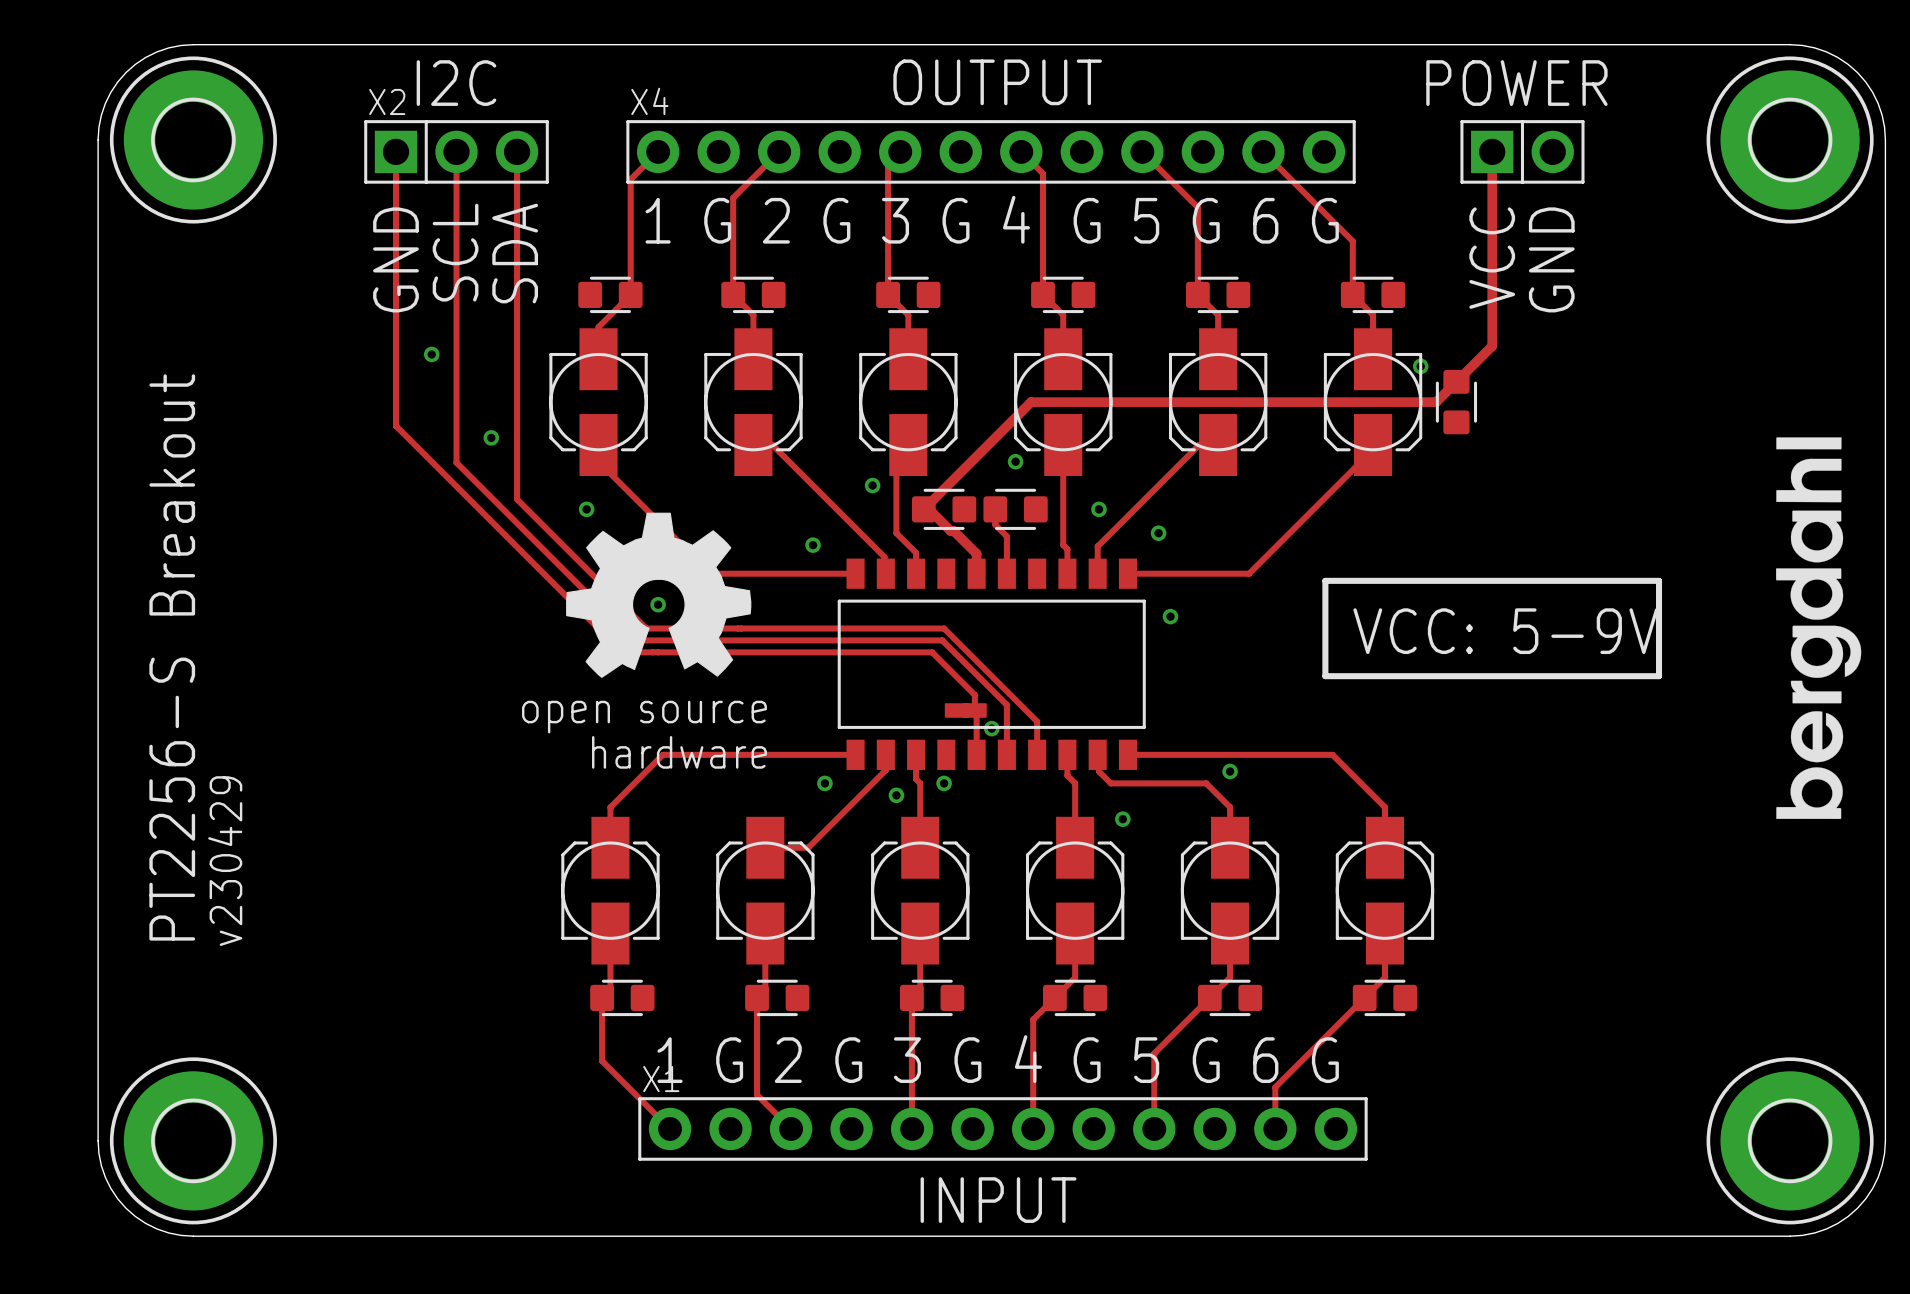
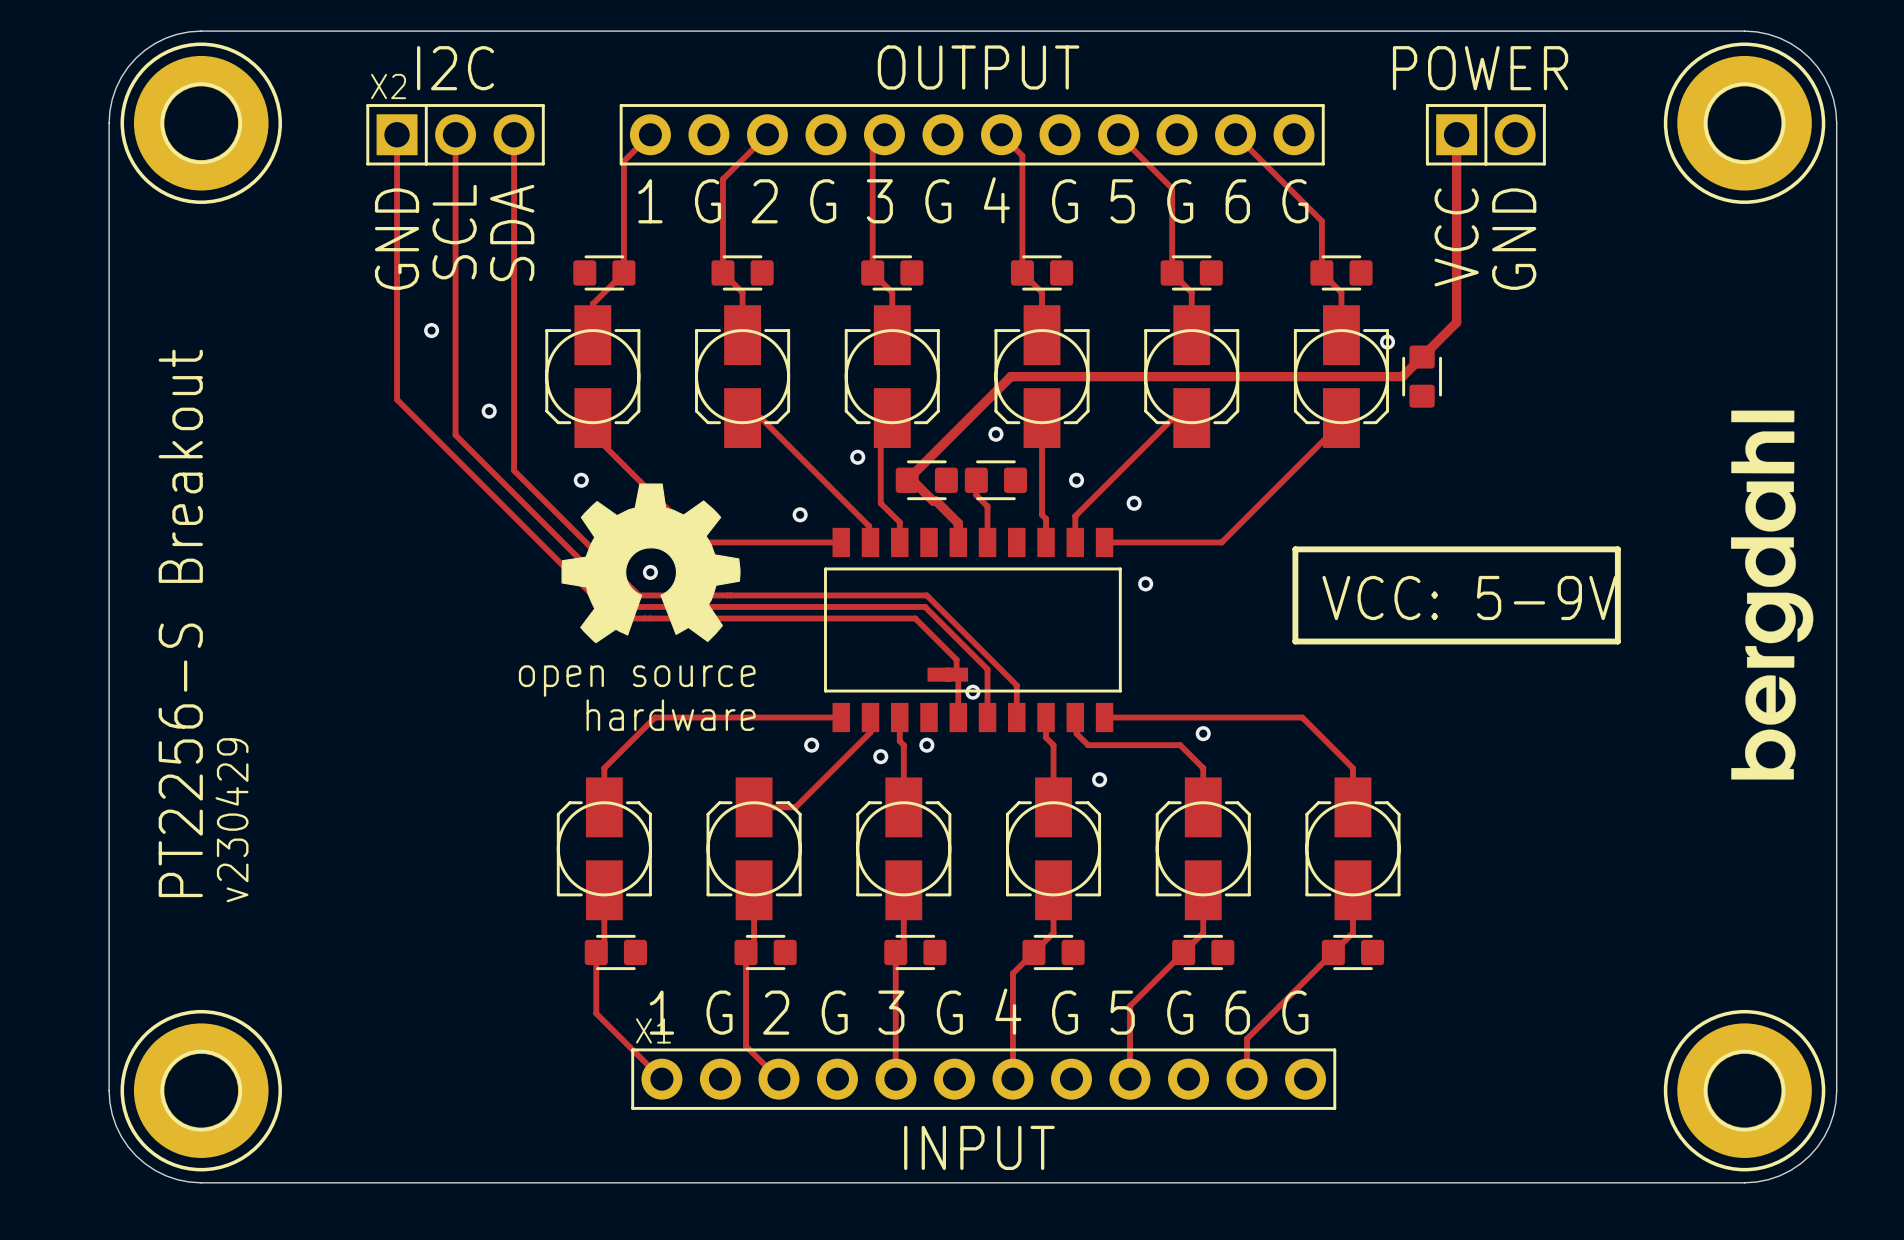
X4 name: X4 (649, 101) -> none

